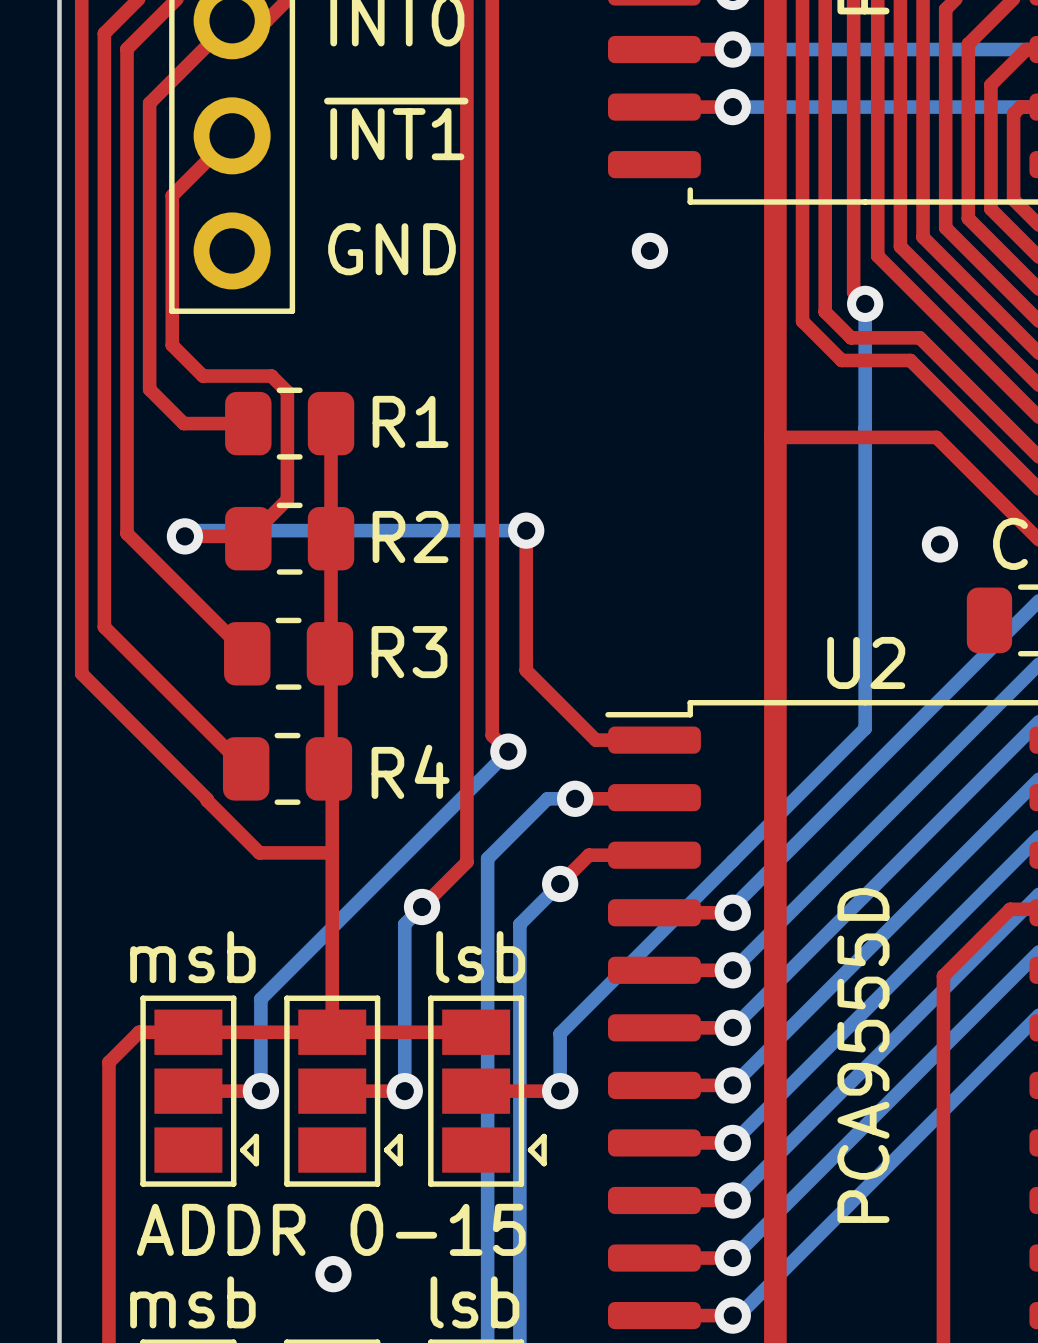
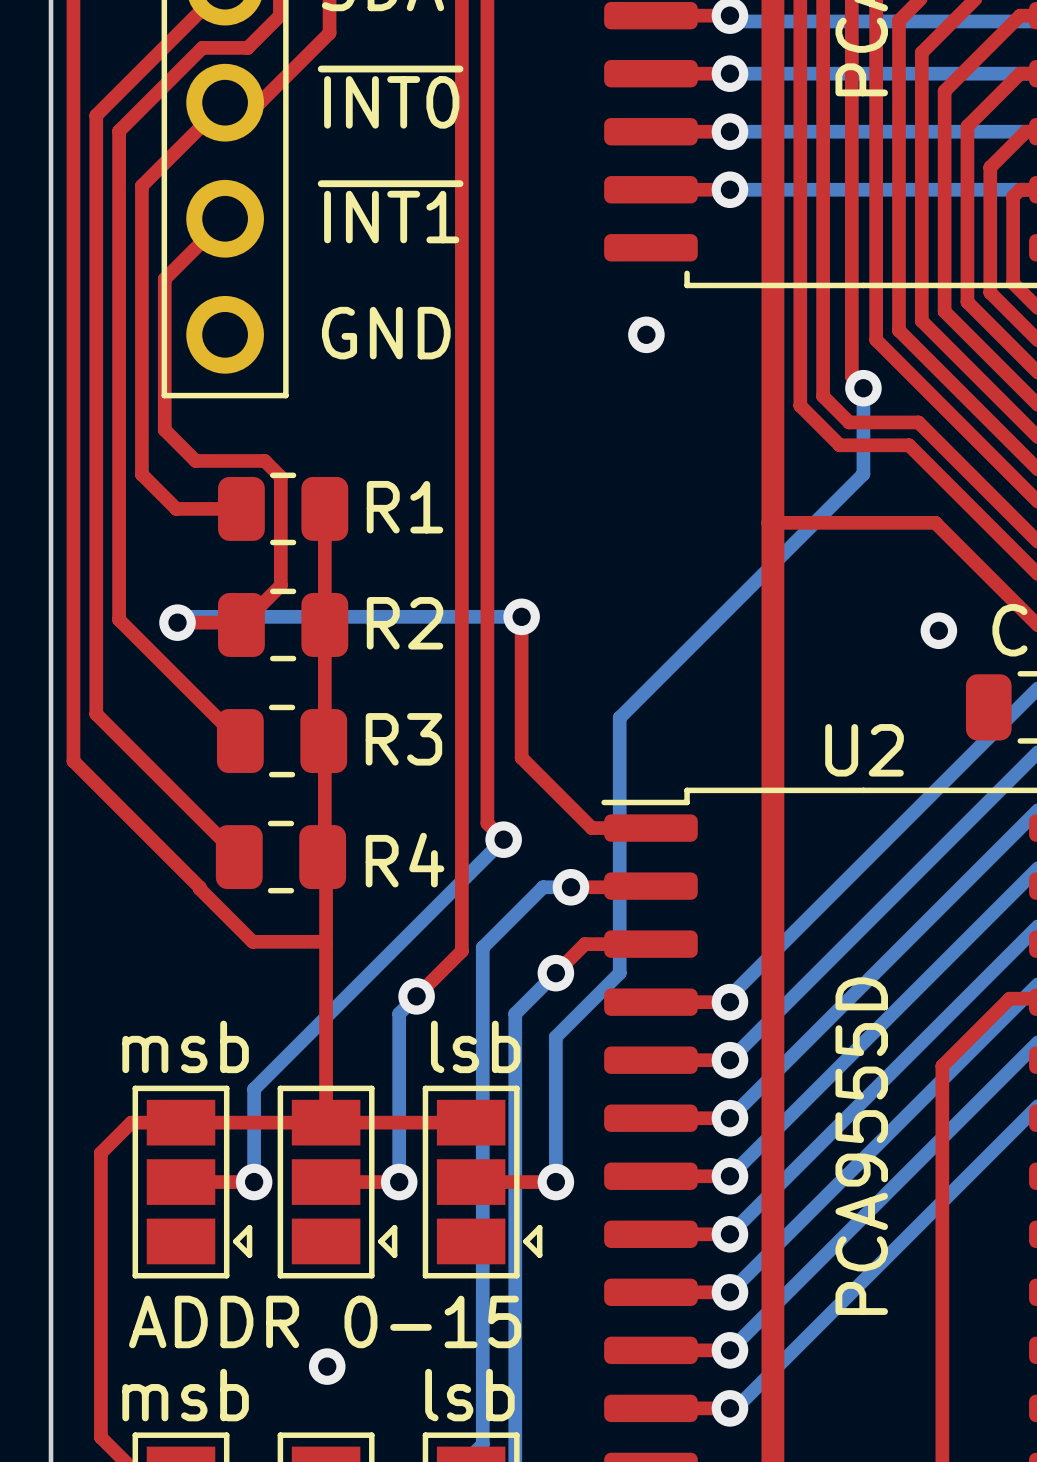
bottom track: (865, 389) (865, 728) (560, 1033) -> (863, 474) (619, 717) (619, 973) (555, 1036) (555, 1124)

